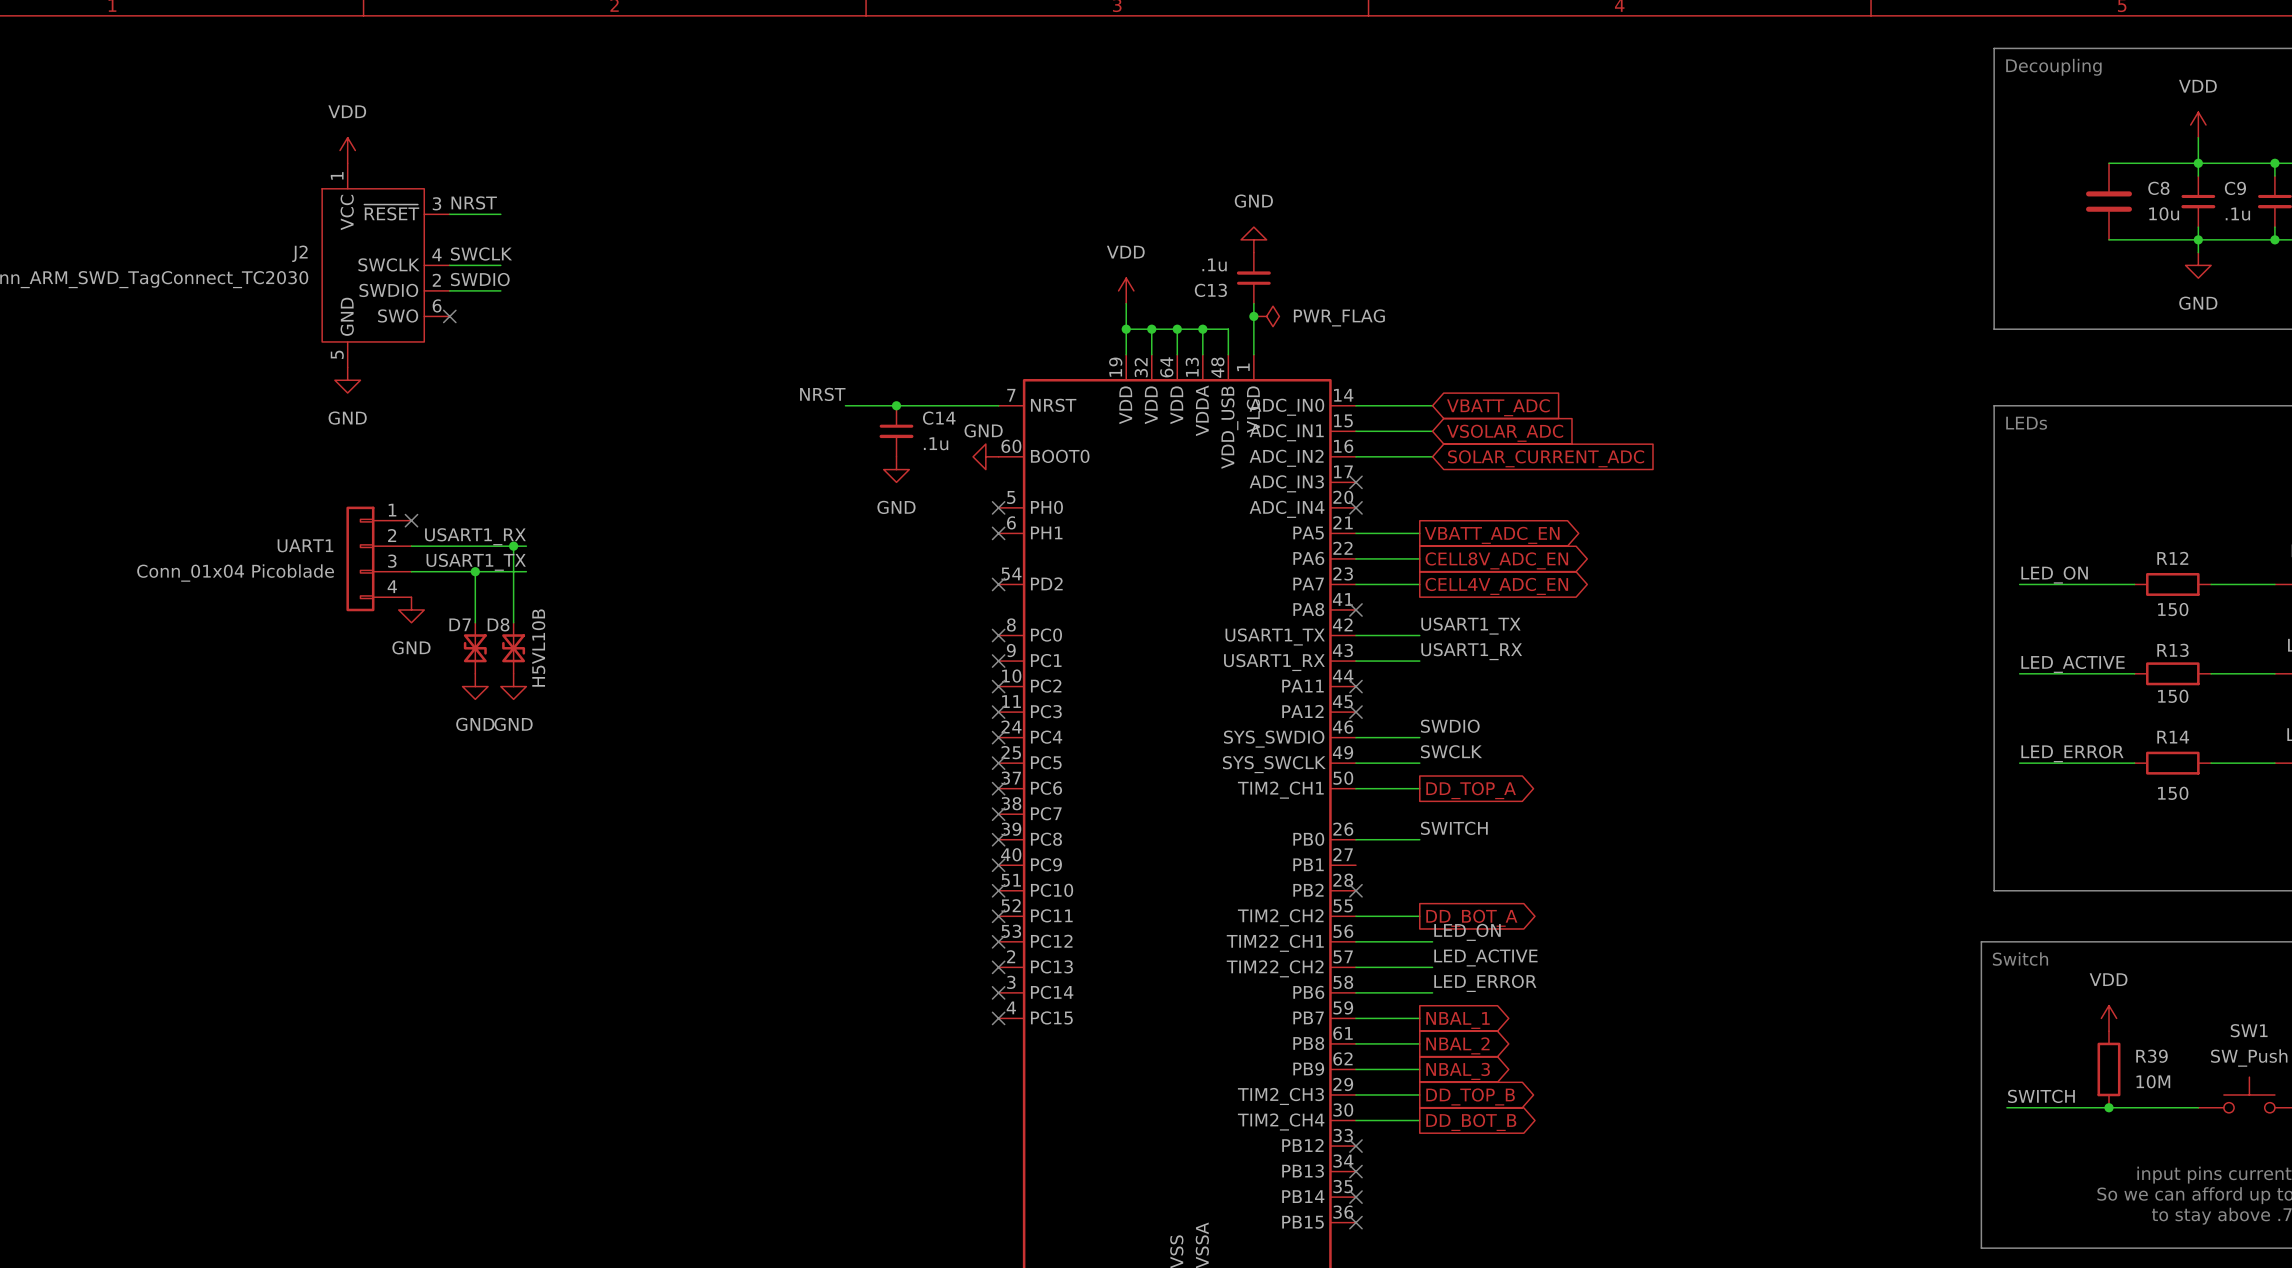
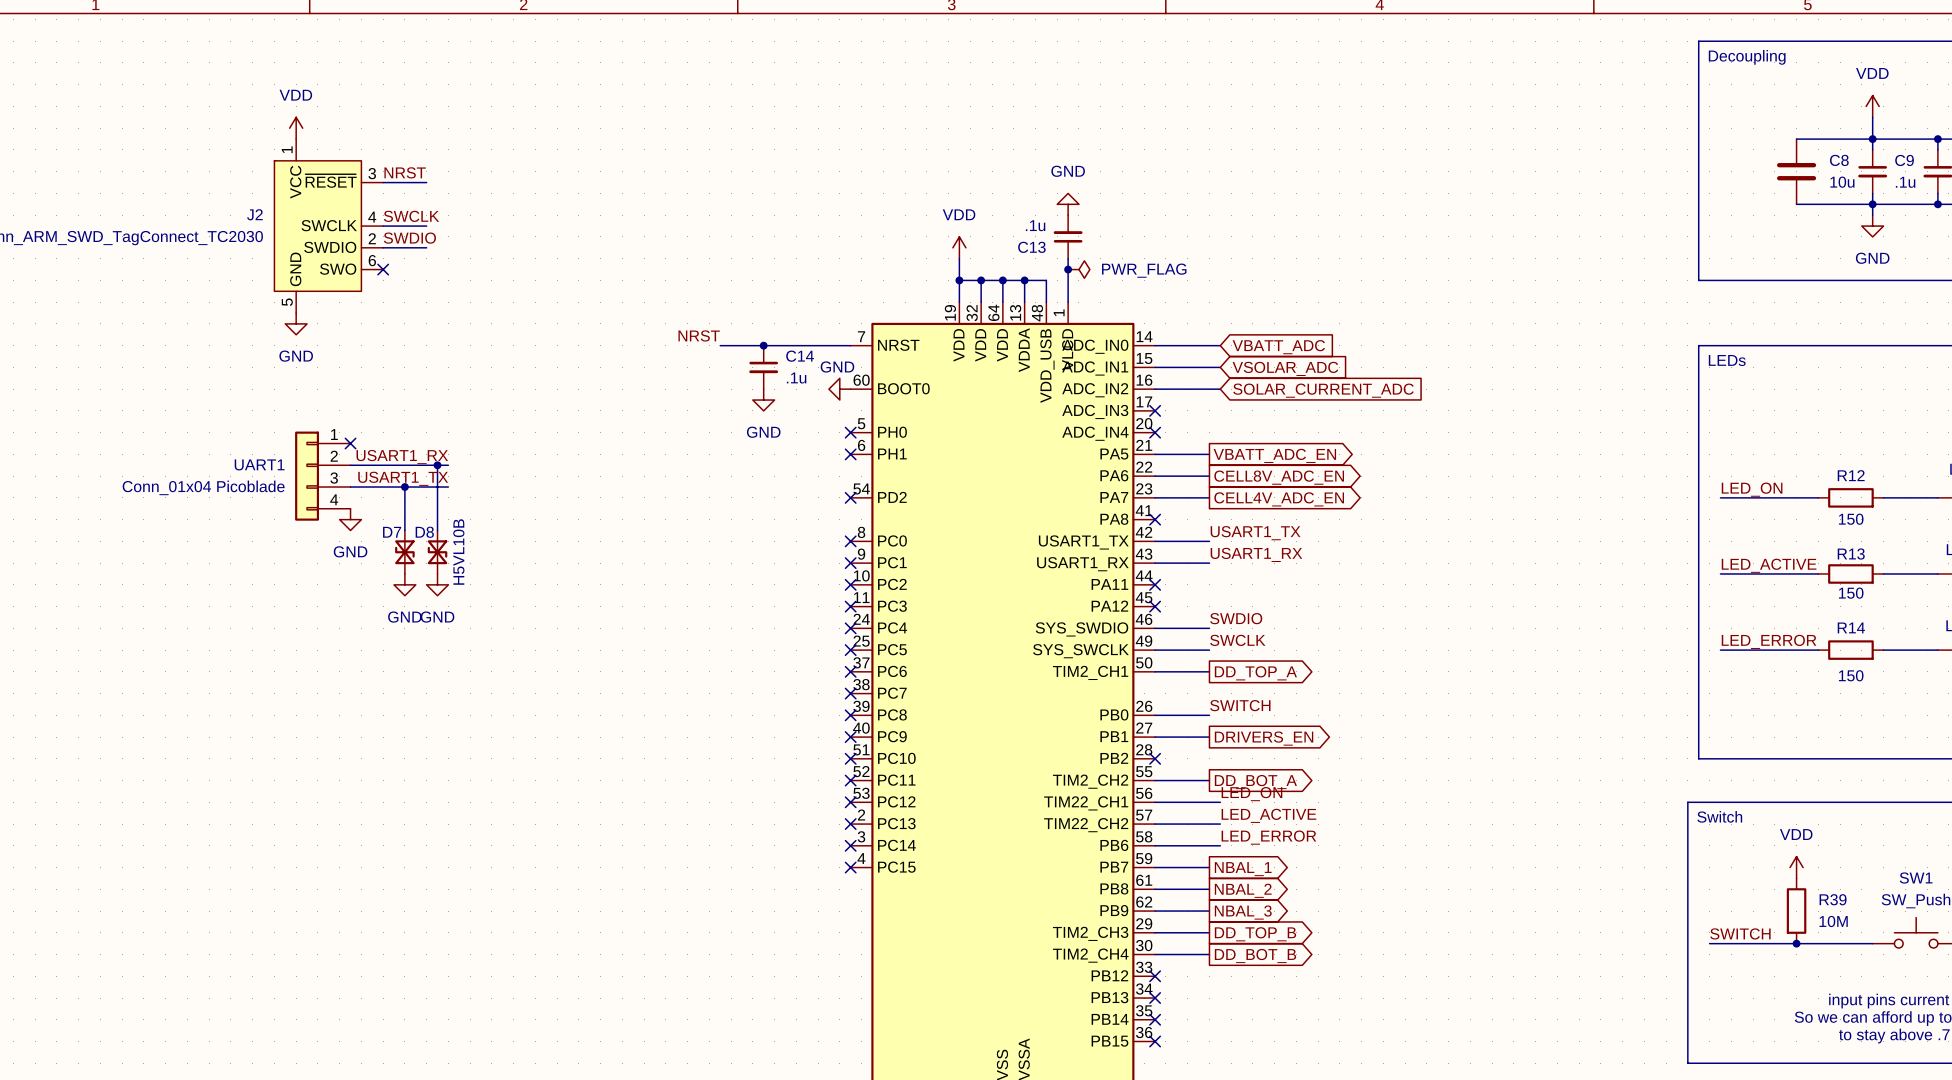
wire: none -> (1155, 737) (1209, 737)
global label: none -> DRIVERS_EN (1264, 738)

